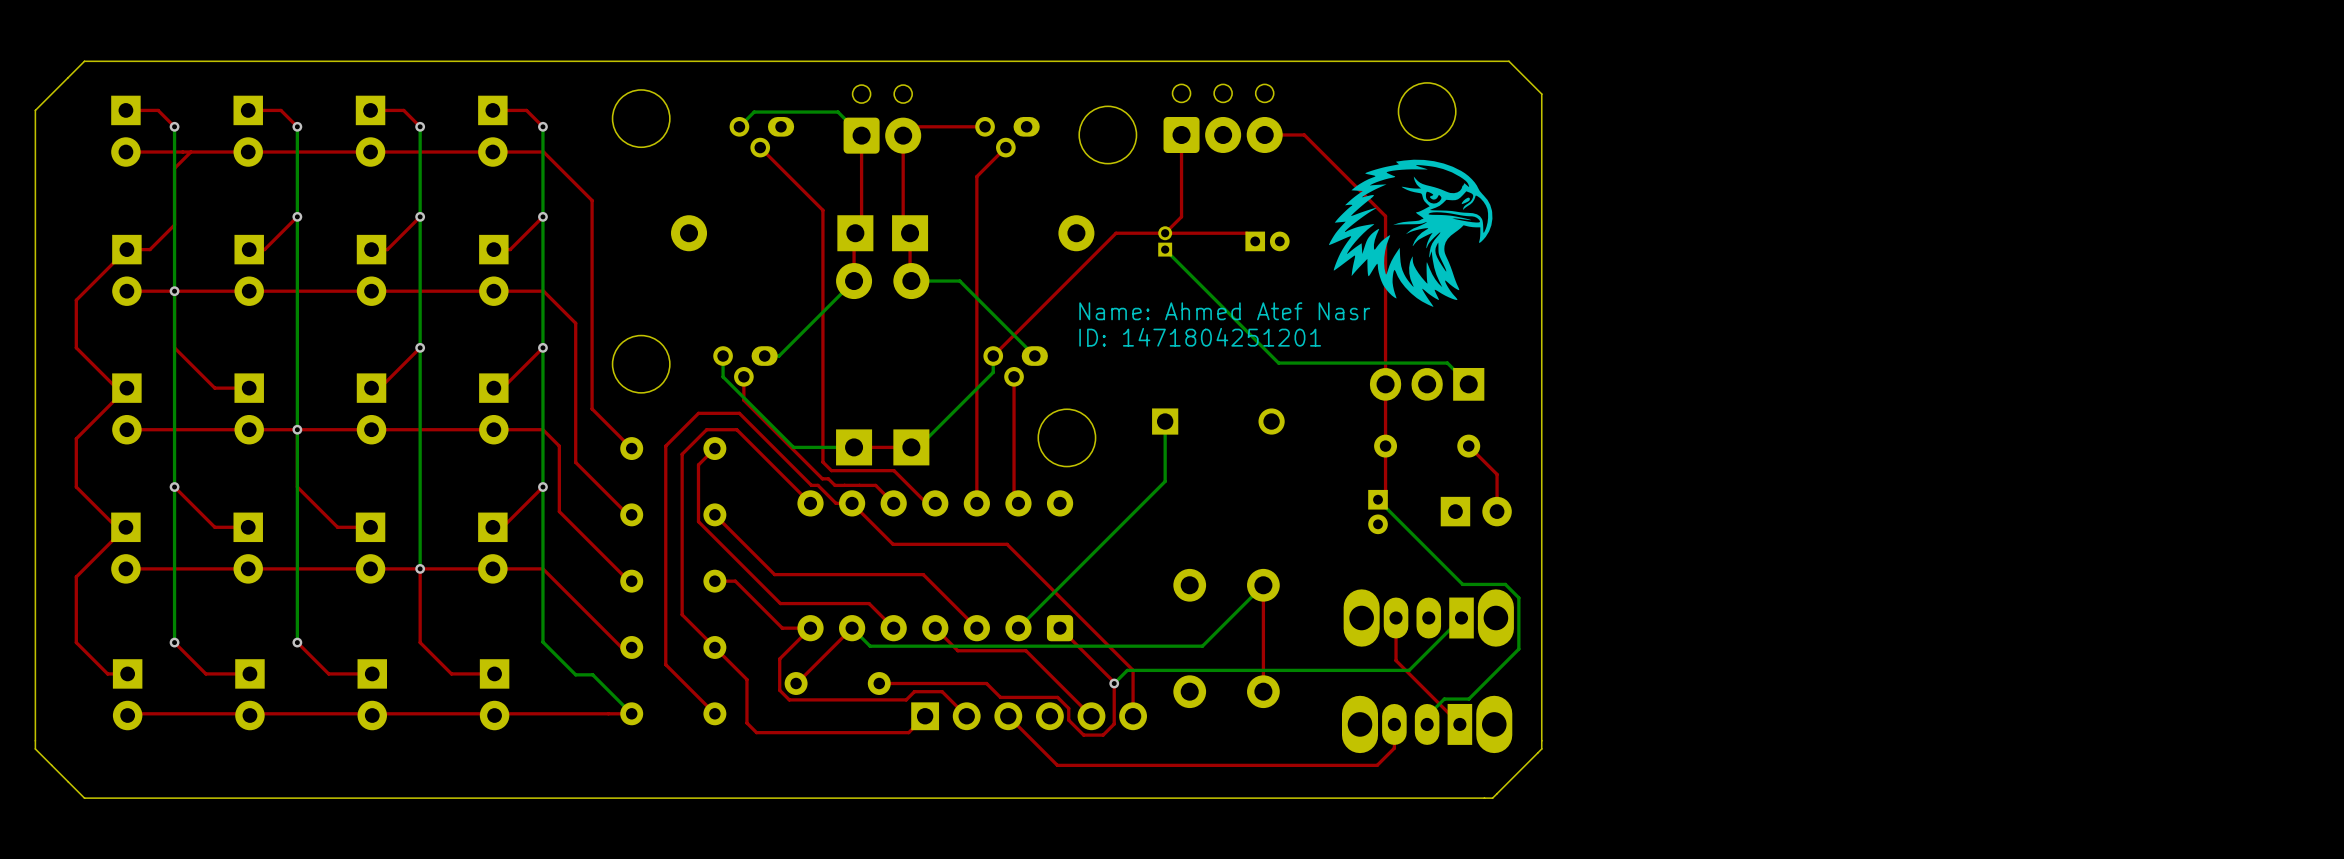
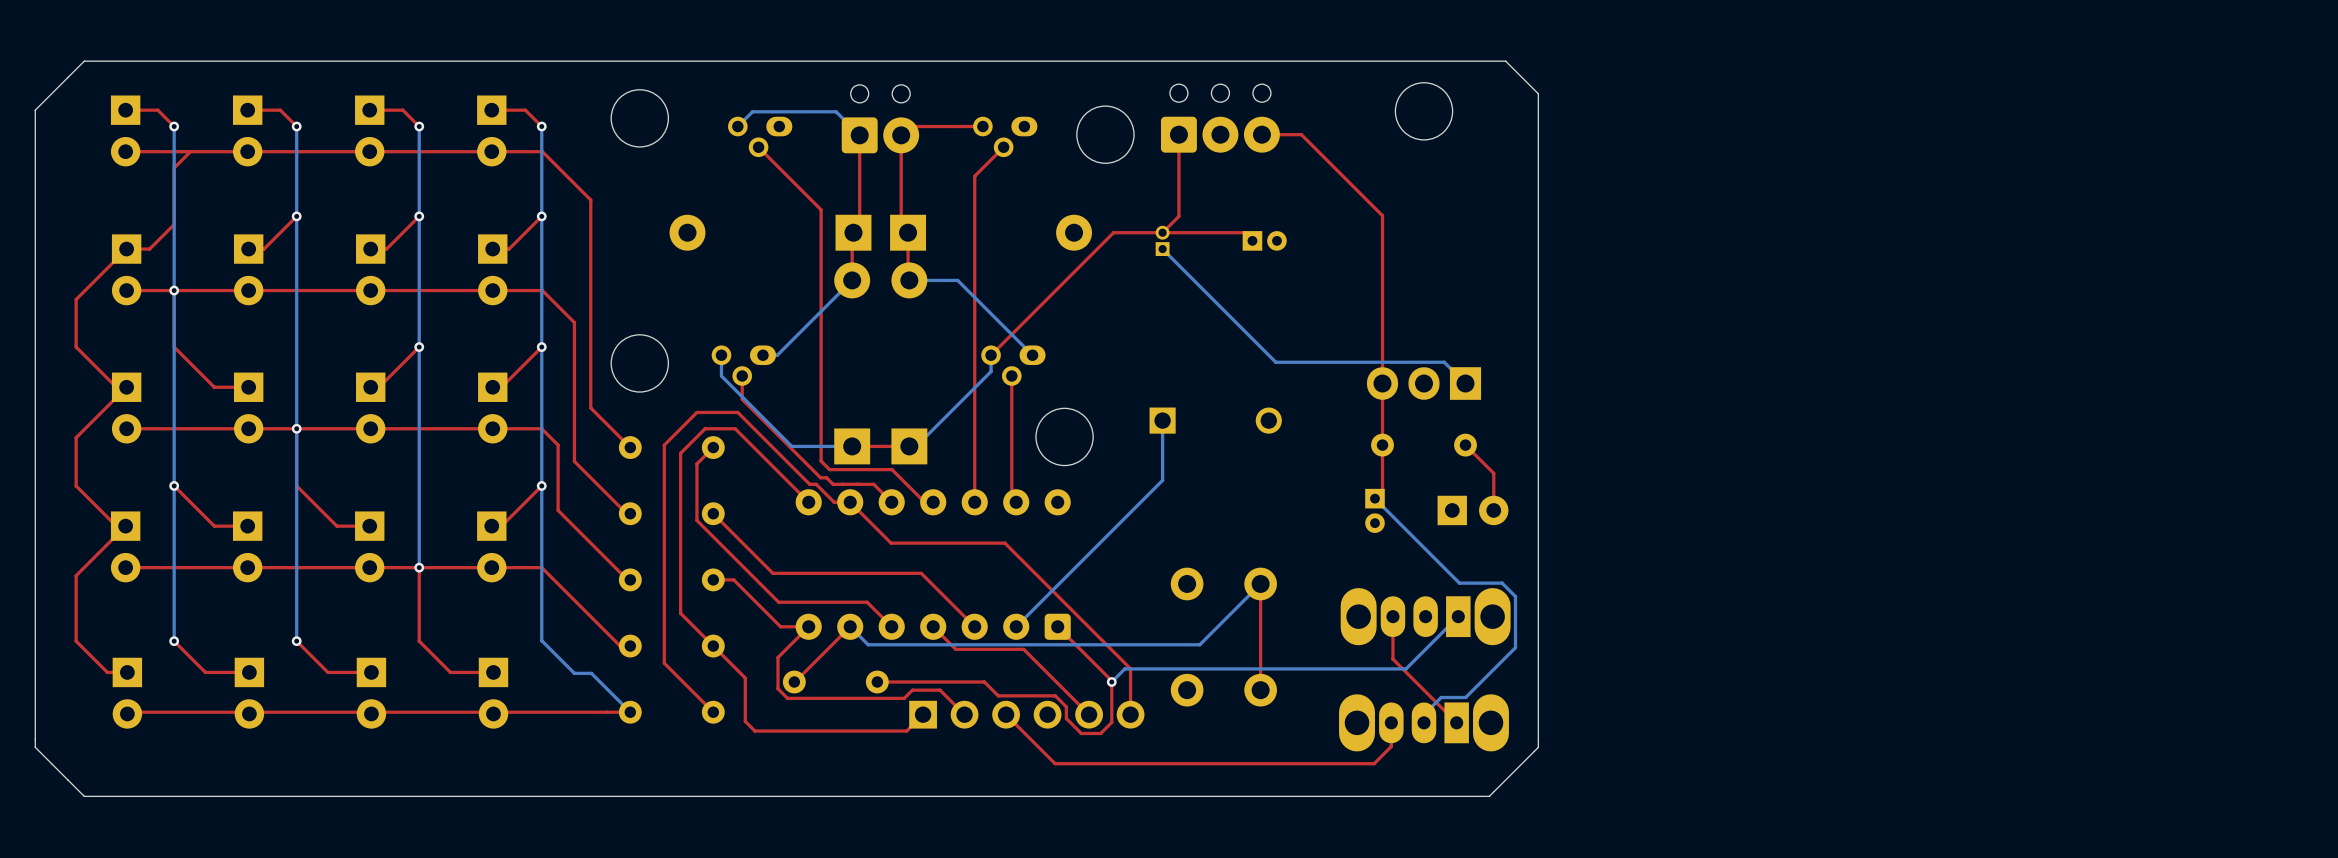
drawing: [1328, 159, 1493, 307] -> none
text: Name: Ahmed Atef Nasr (1224, 311) -> none
text: ID: 1471804251201 (1200, 337) -> none

